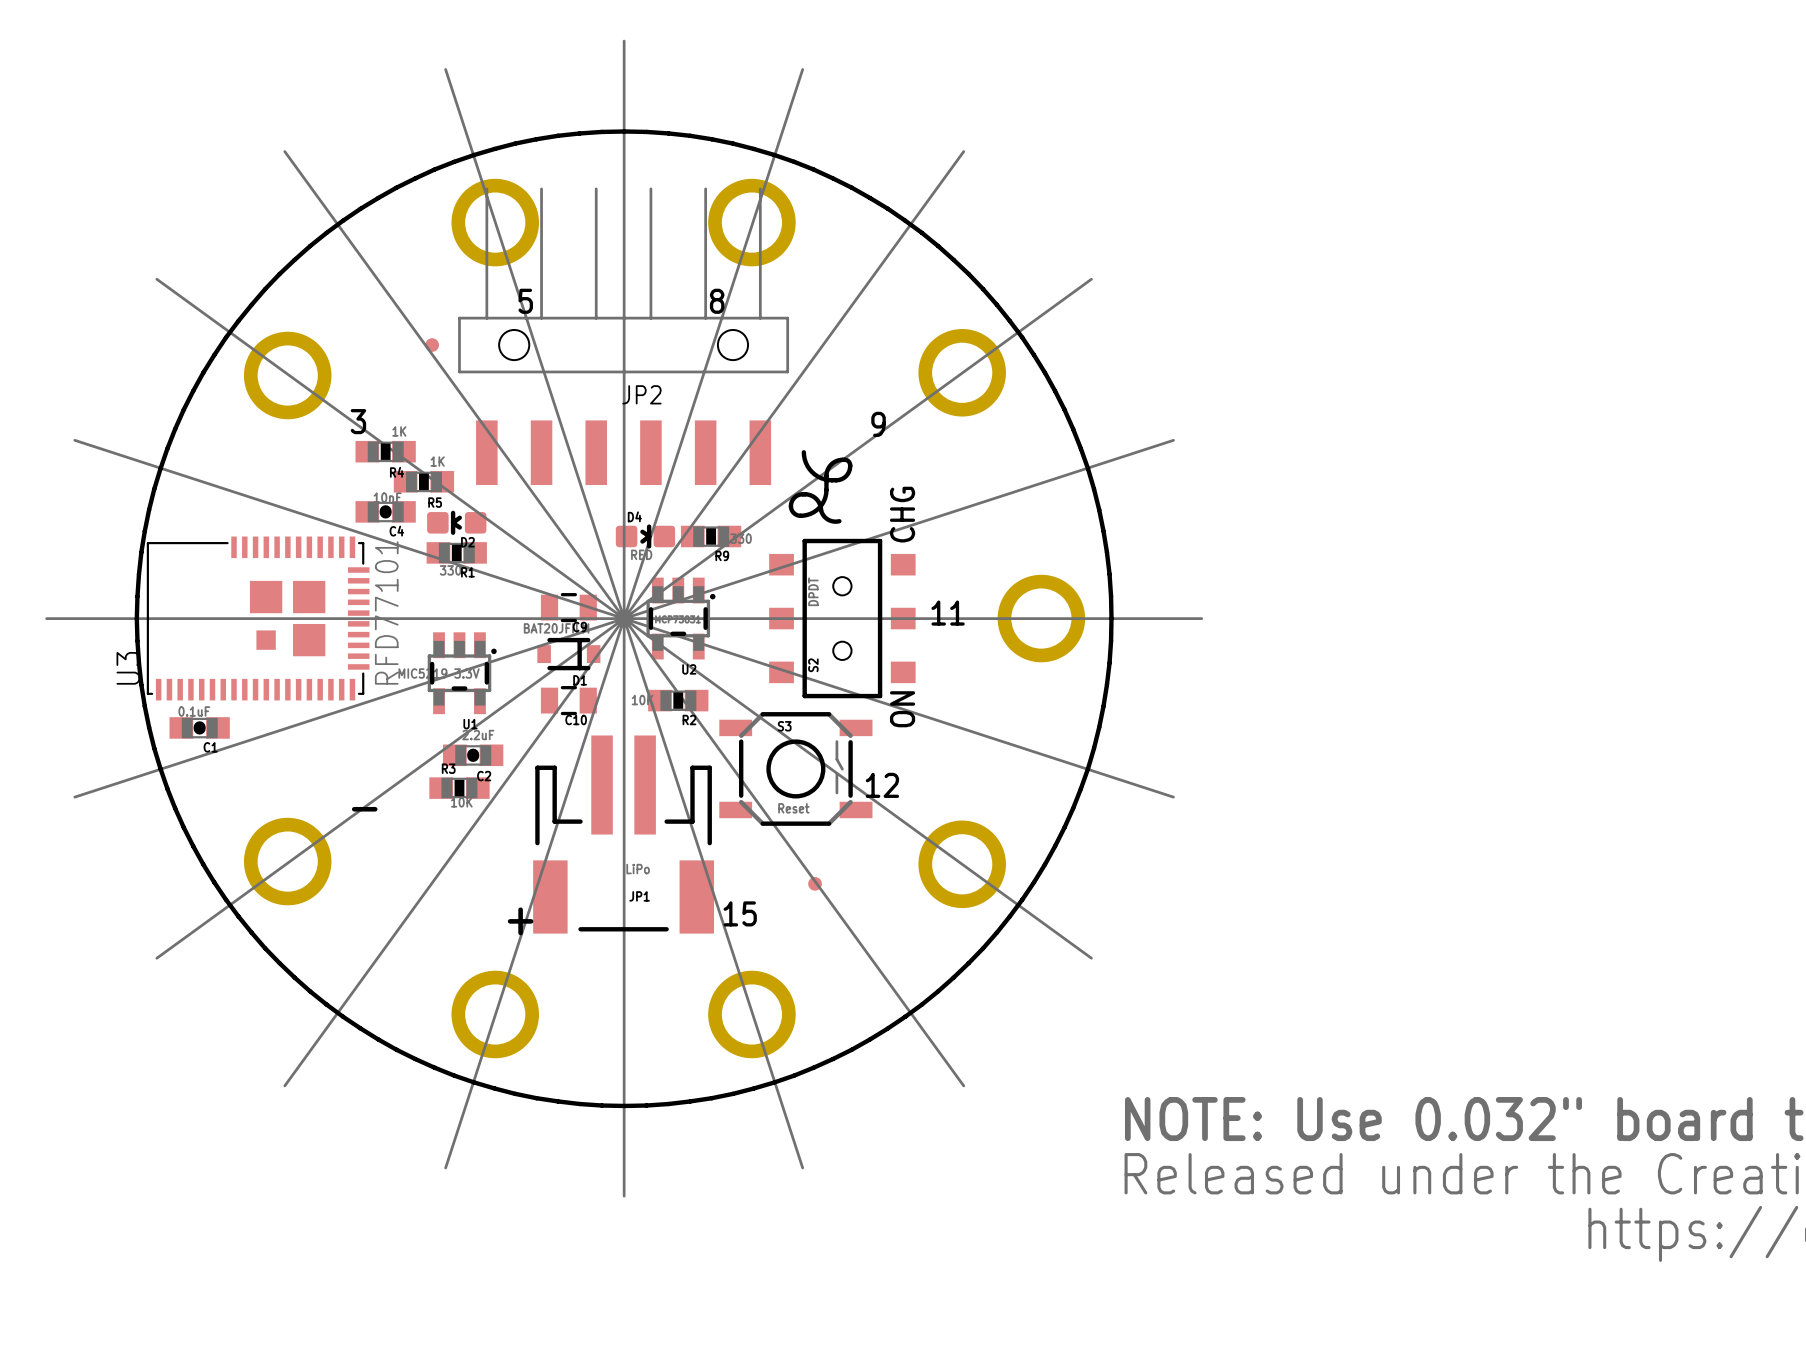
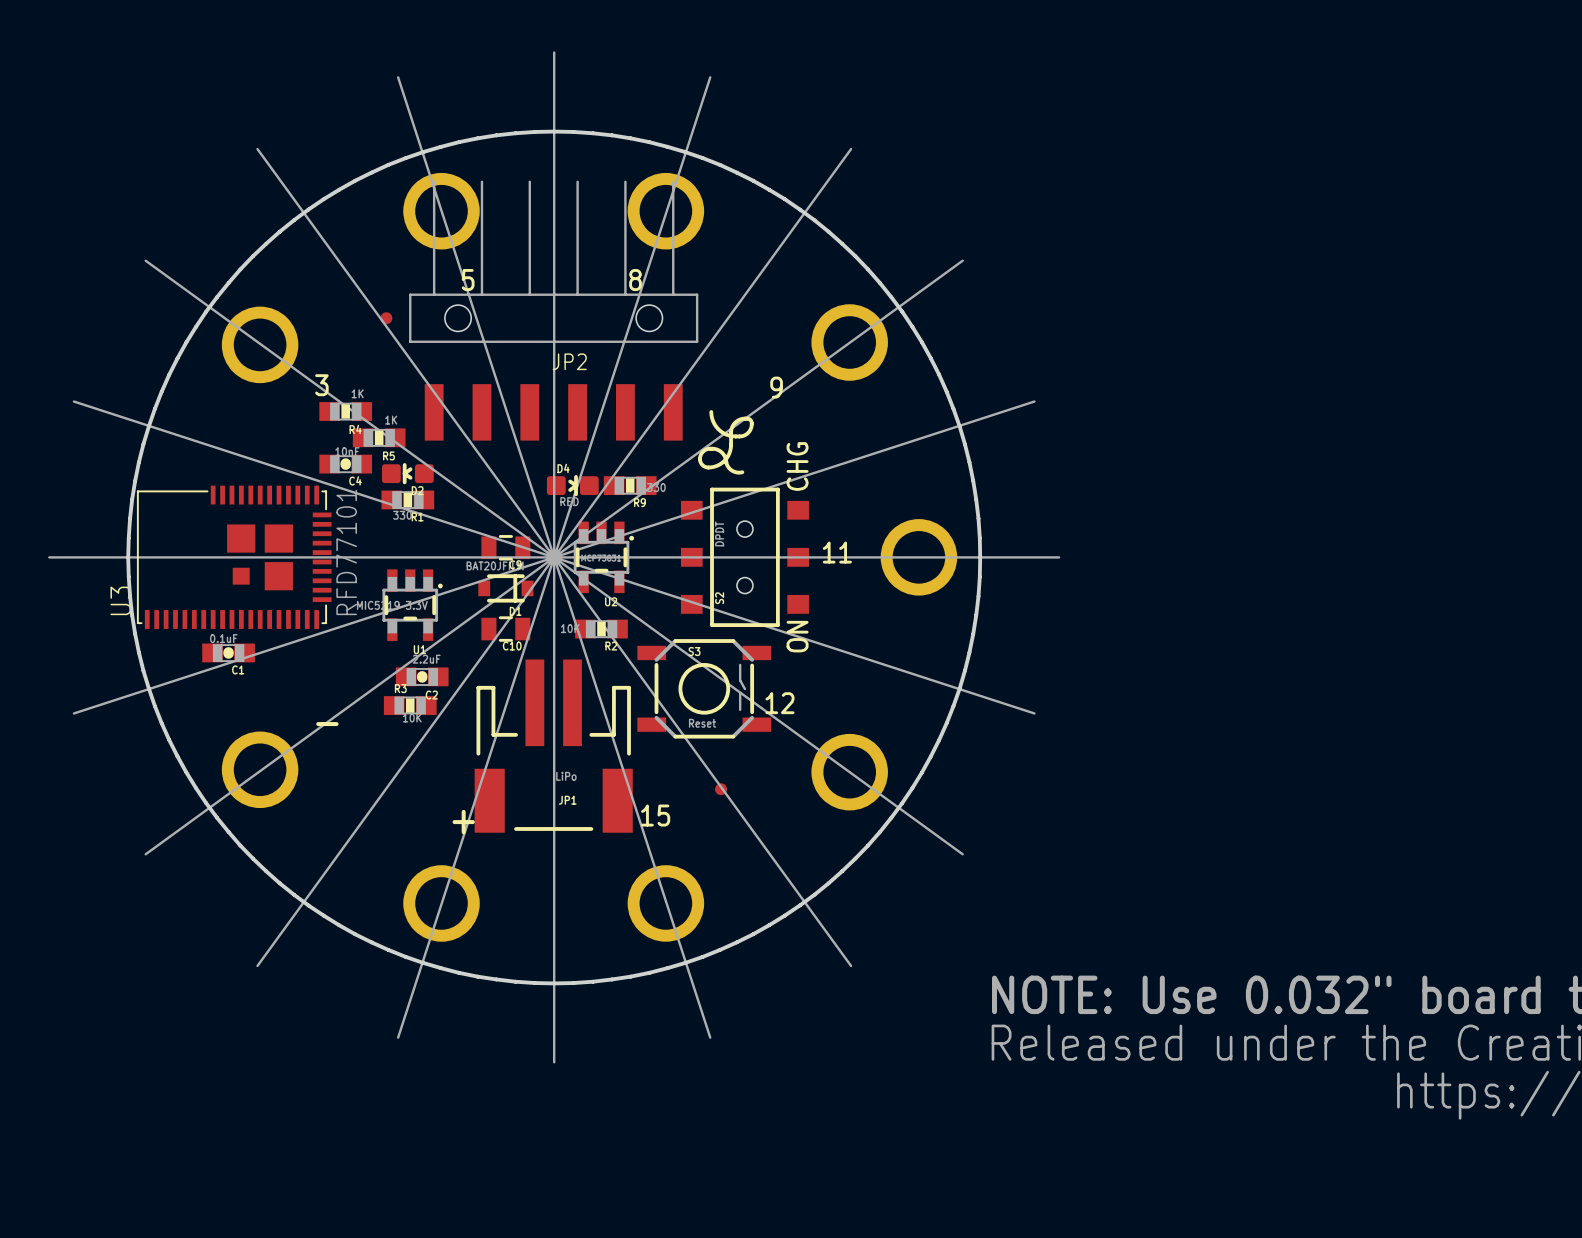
C1 position: (199, 727) -> (228, 652)

